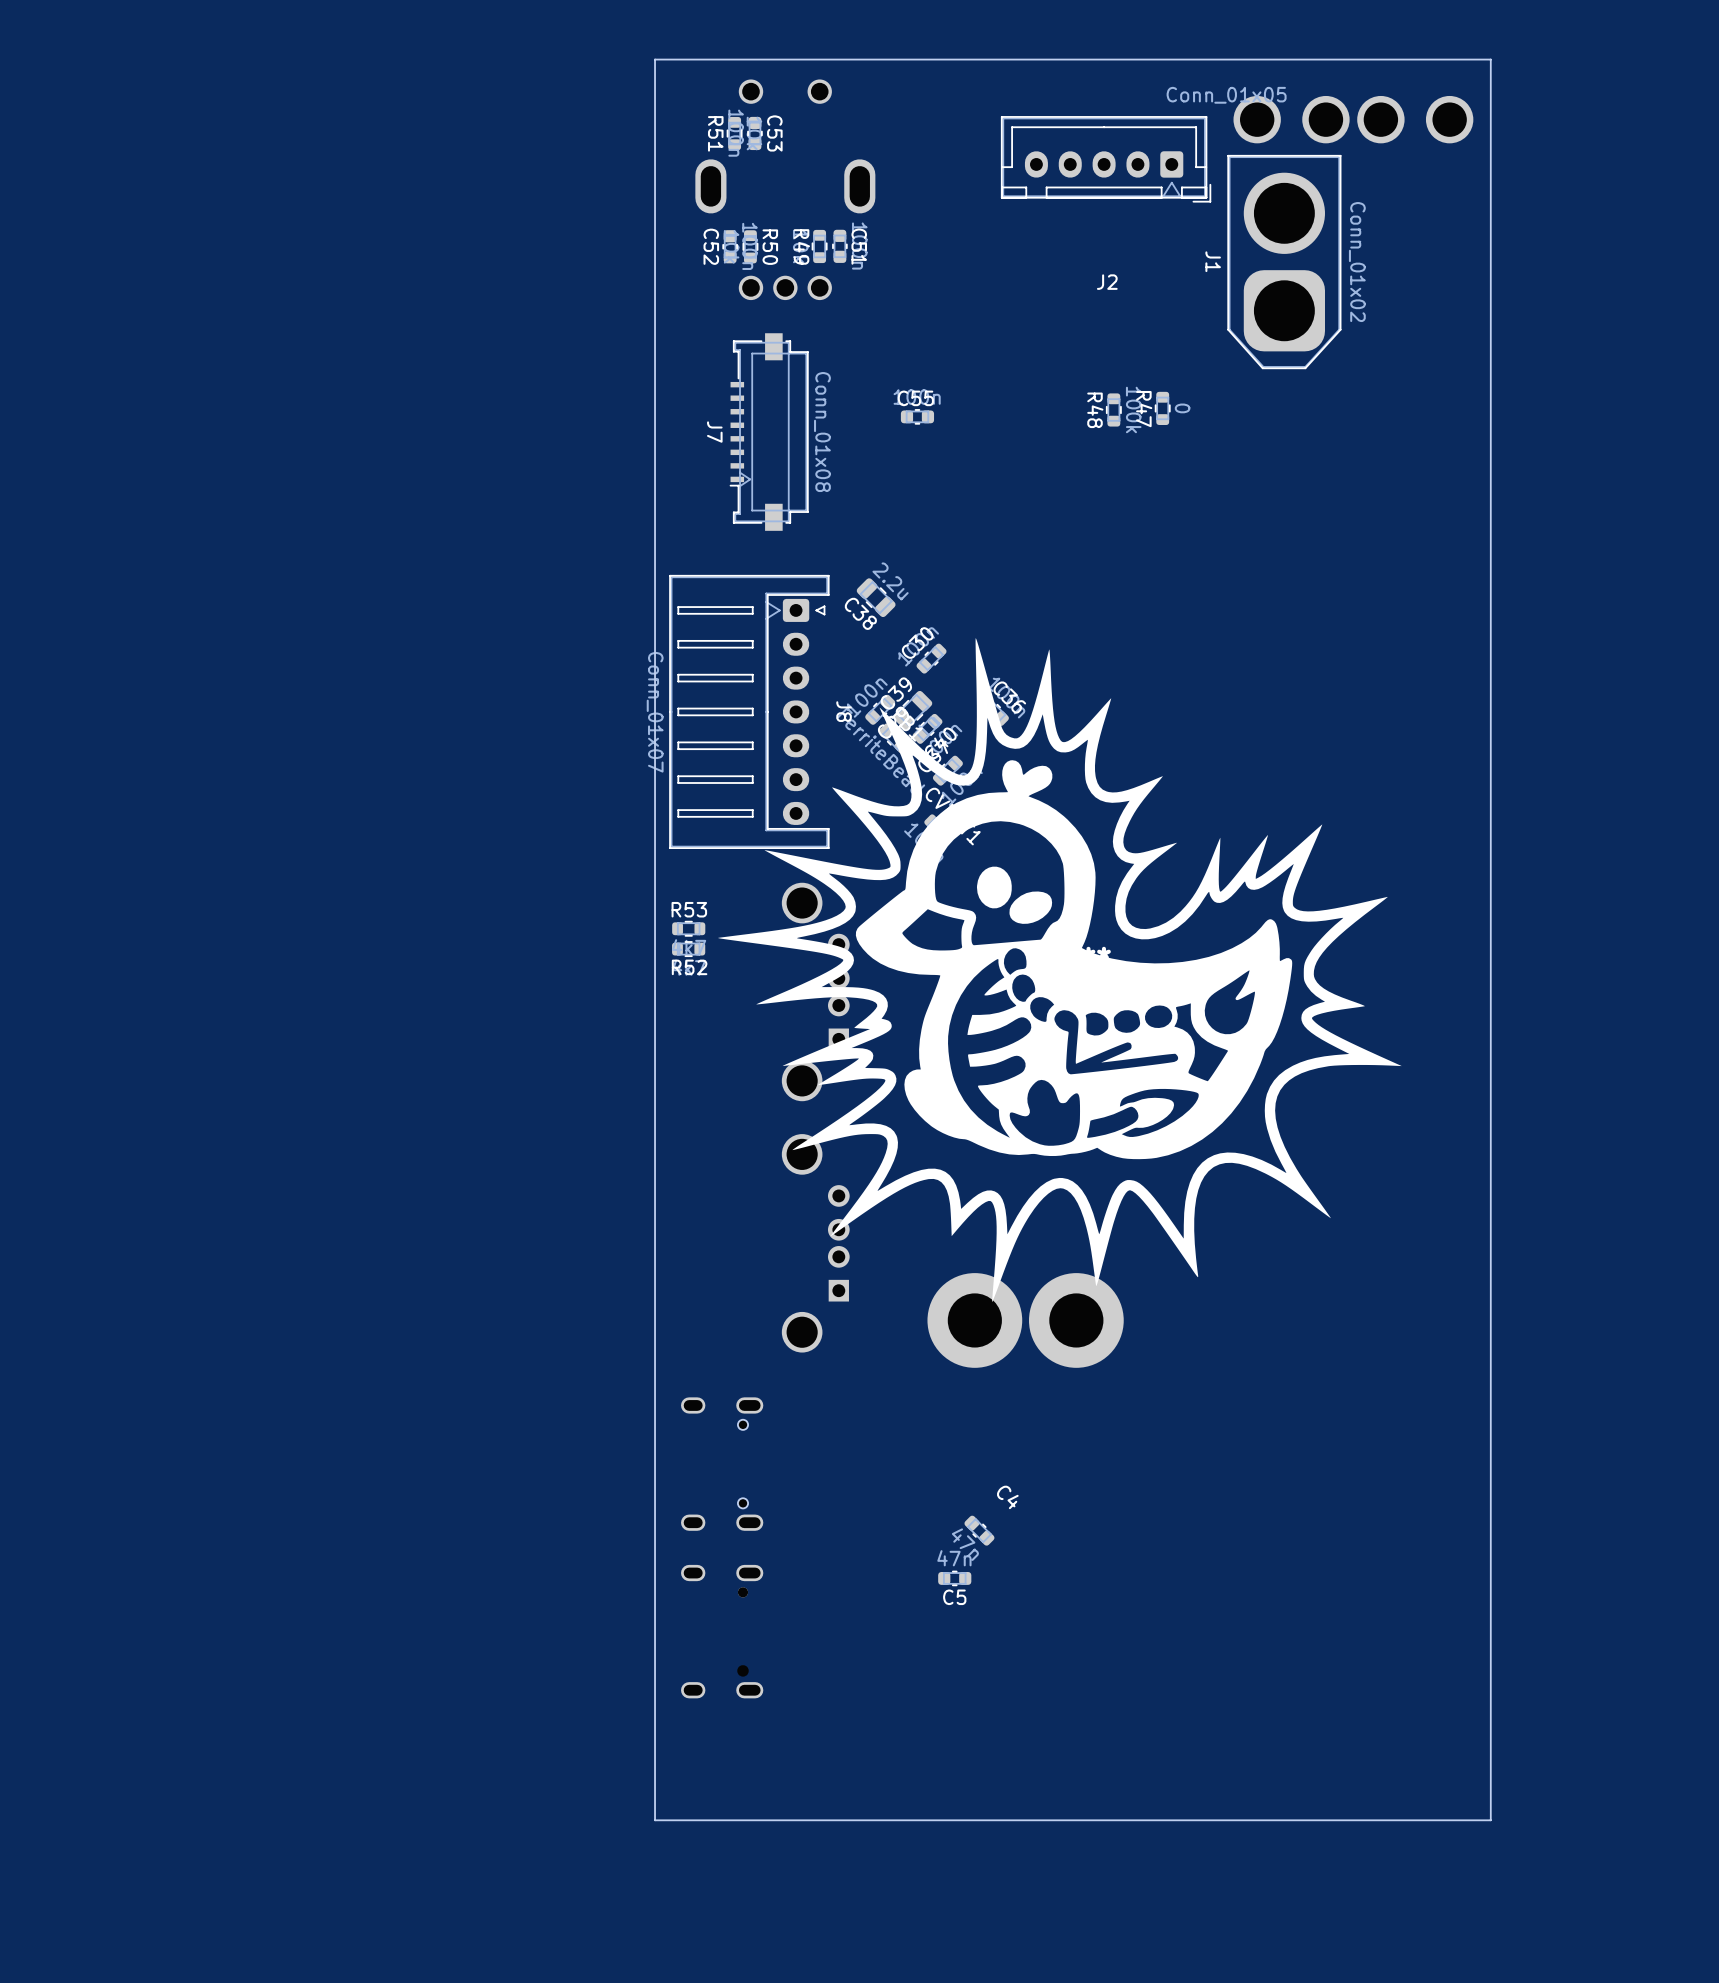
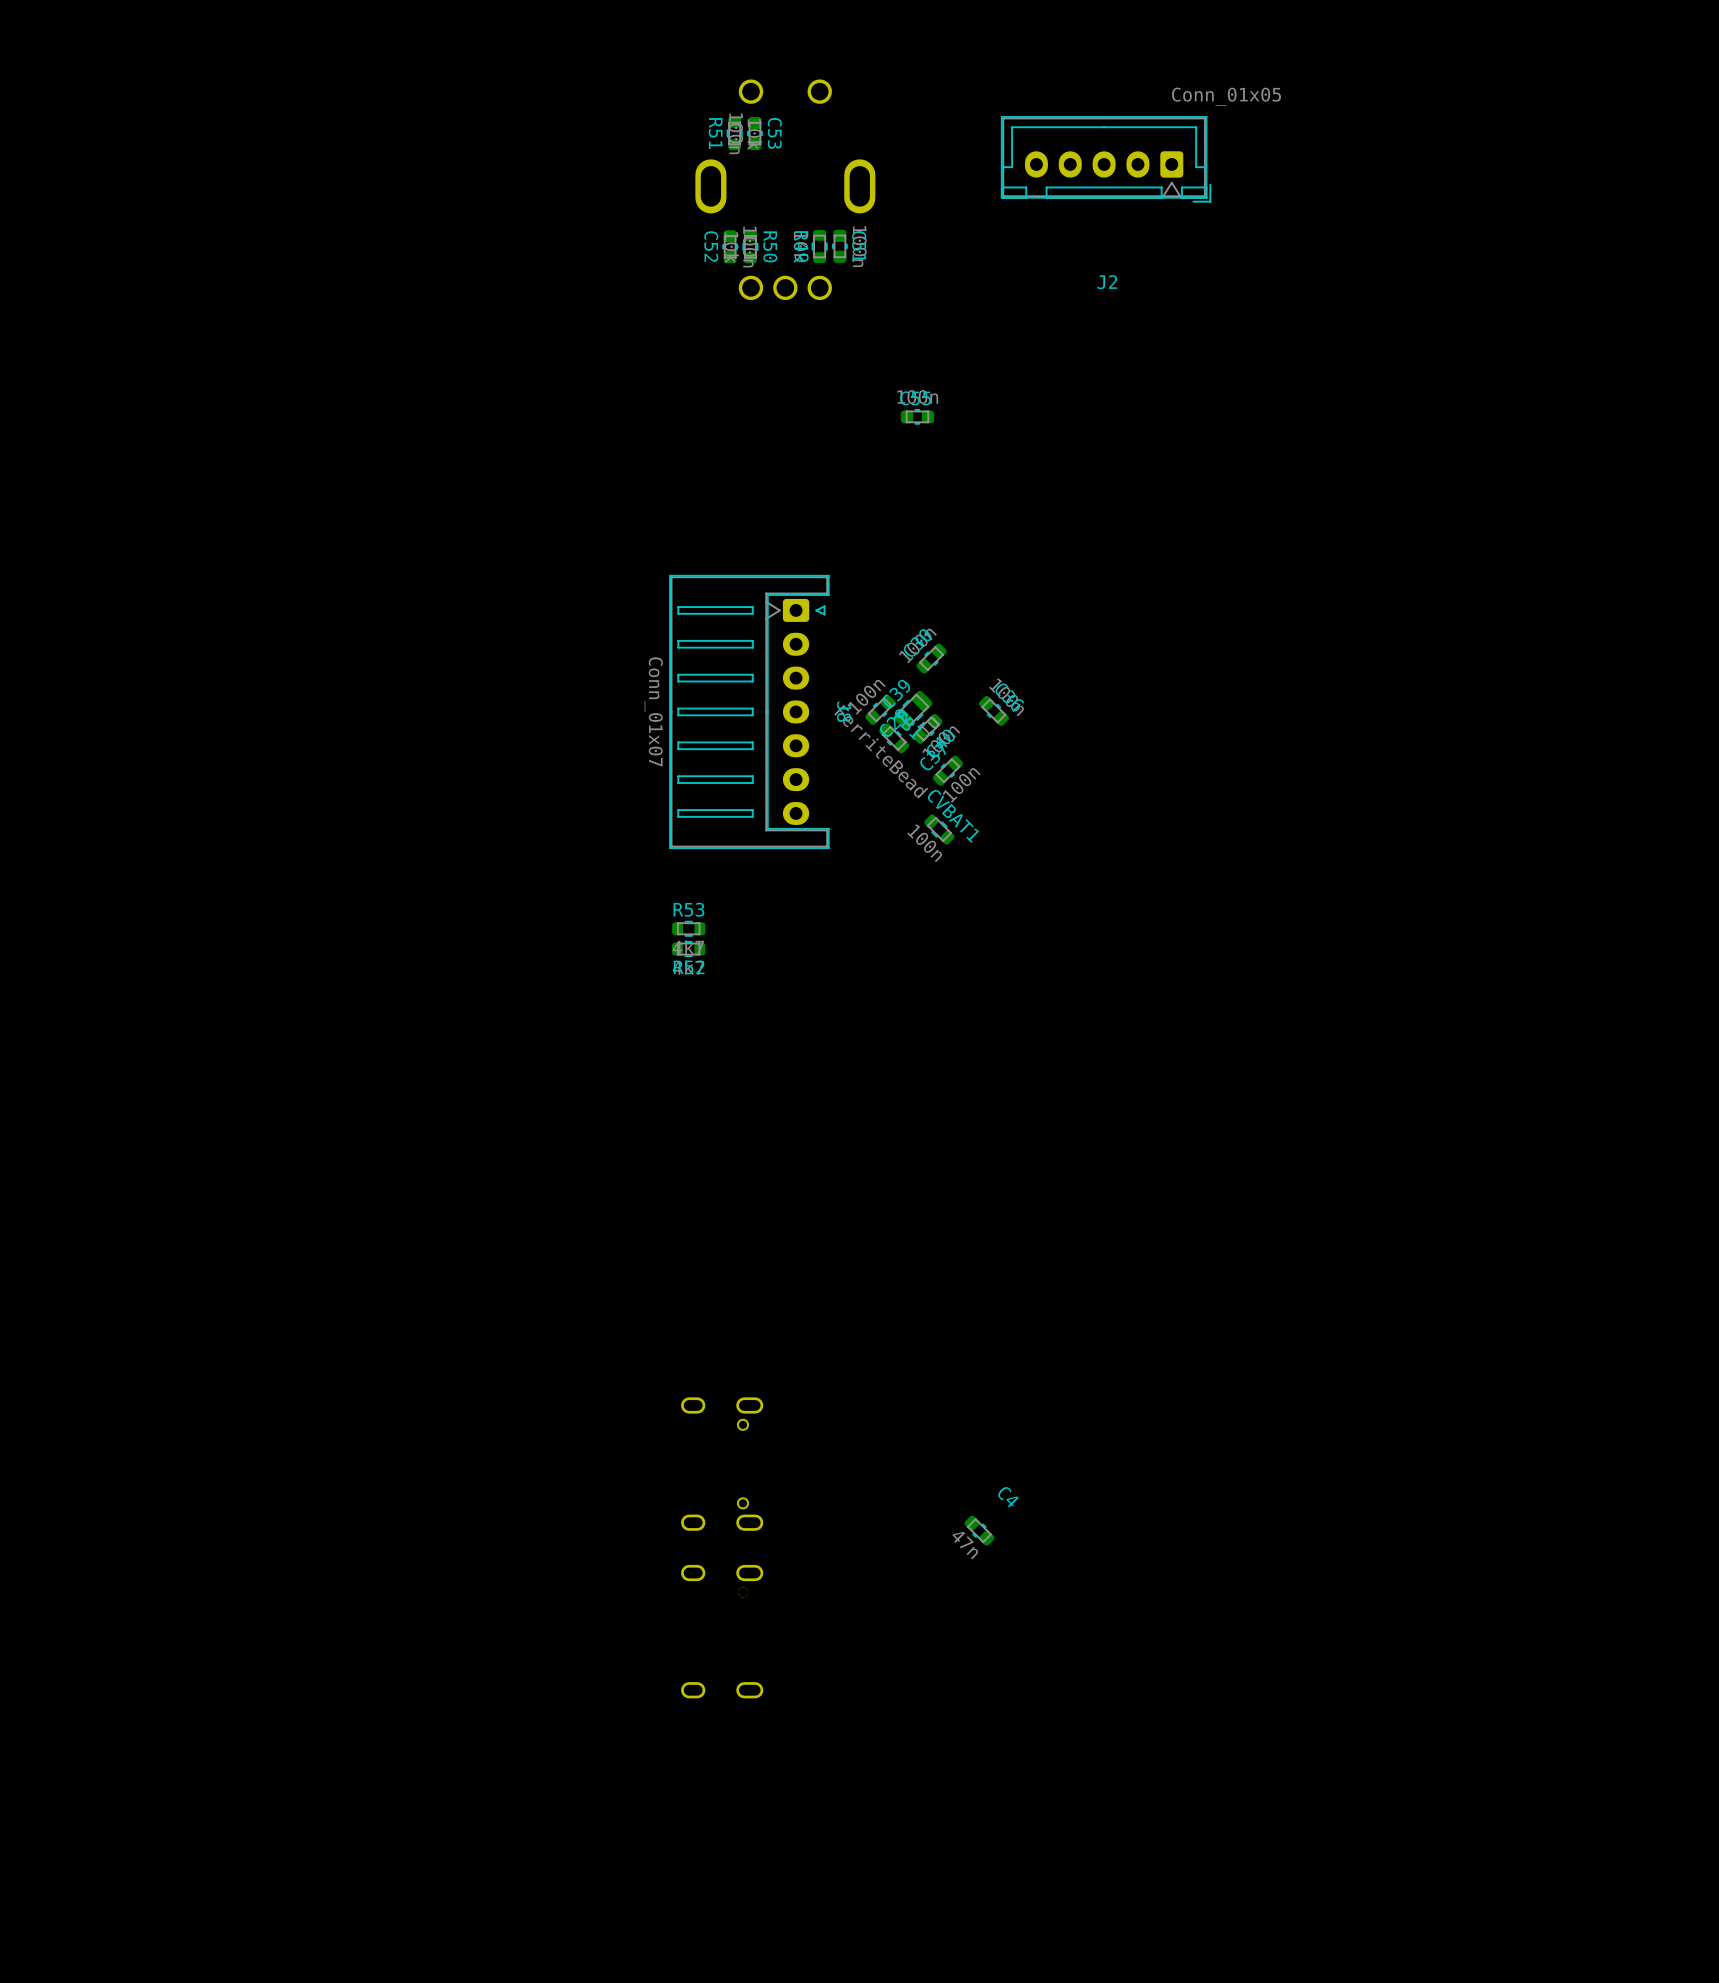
board edge: (1490, 59) (655, 59) (655, 1820) (1490, 1820) (1490, 59) -> none
part: (1353, 119) -> none
J1: Conn_01x02 (1284, 262) -> none
R47: 0 (1162, 408) -> none
R48: 100k (1113, 409) -> none
J7: Conn_01x08 (769, 432) -> none
C38: 2.2u (876, 597) -> none
part: (1059, 970) -> none
part: (815, 991) -> none
part: (815, 1243) -> none
part: (1025, 1320) -> none
C5: 47n (954, 1578) -> none

